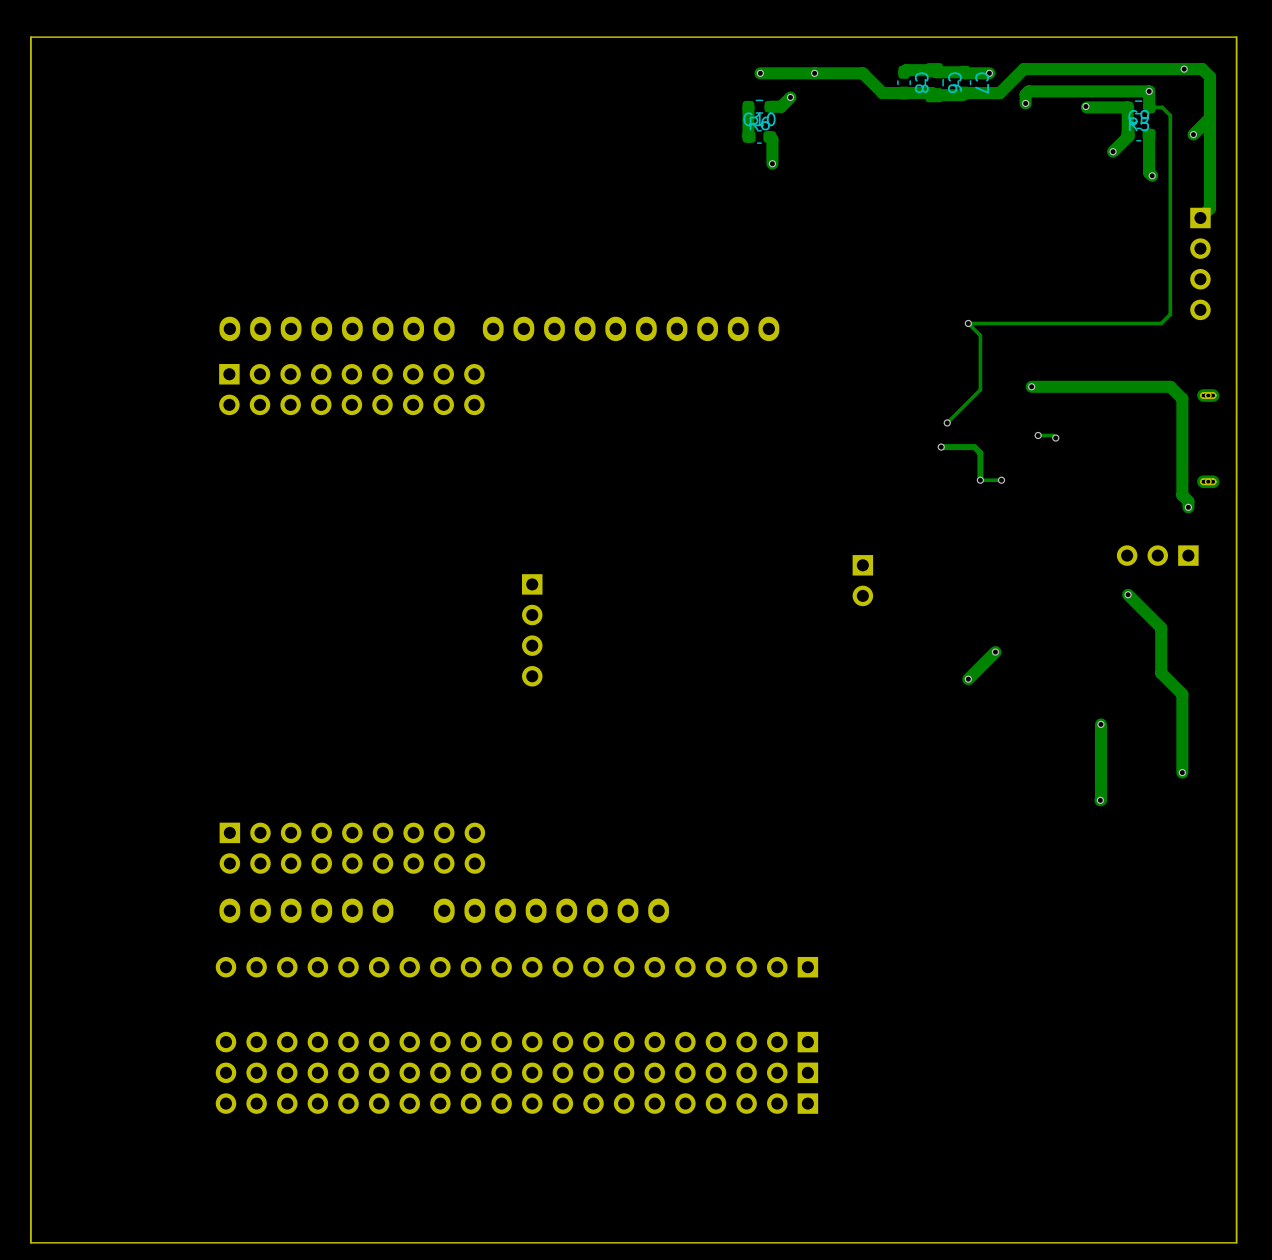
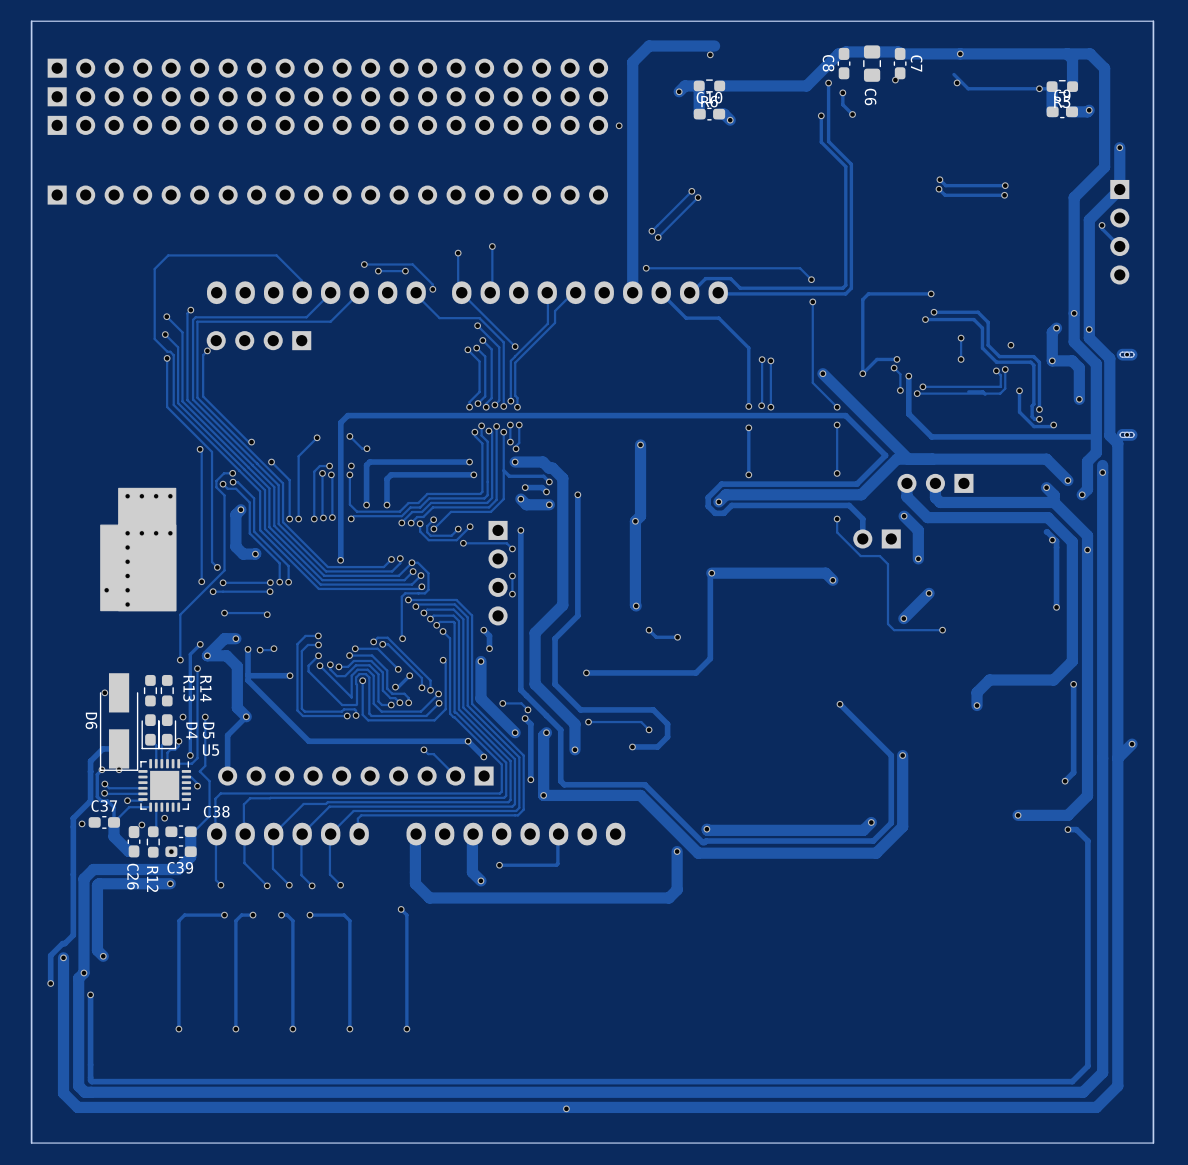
track: none -> (714, 46) (649, 46) (632, 62) (632, 292)
via: (1184, 69) -> none
track: (934, 70) (936, 72) (989, 73) -> (872, 51) (898, 51) (900, 53) (1090, 53) (1104, 68) (1104, 167) (1074, 197) (1074, 341) (1096, 364) (1096, 452) (1087, 461) (1087, 489) (1082, 494)
via: none -> (960, 53)
track: none -> (1067, 53) (1072, 59) (1072, 86)
track: (760, 73) (862, 73) (882, 93) (962, 95) (964, 93) (999, 93) (1023, 69) (1202, 69) (1210, 76) (1210, 208) (1200, 217) -> none
via: (814, 73) -> none
via: (989, 73) -> none
C8 name position: C8 (921, 82) -> C8 (828, 63)
C6 name position: C6 (954, 82) -> C6 (870, 96)
part: none -> (327, 68)
via: (1149, 91) -> none
track: (790, 97) (781, 106) -> (844, 53) (838, 53) (806, 85) (729, 85)
via: (790, 97) -> none
via: none -> (895, 80)
track: none -> (828, 83) (828, 141) (851, 164) (851, 288) (845, 293) (718, 293)
via: none -> (828, 83)
track: (1025, 103) (1025, 94) (1028, 91) (1149, 91) (1149, 106) (1162, 107) (1170, 115) (1170, 314) (1161, 323) (968, 323) (980, 335) (980, 389) (947, 422) -> none
track: none -> (699, 85) (685, 85) (679, 91)
via: (1085, 106) -> none
track: (1127, 107) (1086, 107) -> (1052, 86) (1049, 88) (968, 88) (953, 74)
via: none -> (1039, 88)
via: none -> (679, 91)
track: none -> (842, 92) (842, 104) (852, 114)
via: none -> (842, 92)
part: none -> (327, 96)
track: (1210, 118) (1193, 134) -> none
via: none -> (1089, 110)
track: (1128, 134) (1113, 151) -> none
track: (1149, 134) (1149, 172) (1152, 175) -> (1071, 111) (1089, 110)
via: (1193, 134) -> none
track: (769, 136) (772, 139) (772, 163) -> (719, 114) (724, 114) (730, 120)
via: none -> (852, 114)
track: none -> (821, 115) (821, 142) (845, 166) (845, 285) (842, 288) (740, 288) (730, 278) (705, 278) (690, 293)
via: none -> (821, 115)
part: none -> (327, 125)
via: none -> (619, 125)
via: (1113, 151) -> none
via position: (772, 163) -> (730, 120)
track: none -> (1119, 147) (1119, 189) (1089, 219) (1089, 338) (1109, 358) (1109, 435) (1117, 443) (1117, 1086) (1096, 1107) (77, 1107) (63, 1093) (63, 957)
via: none -> (1119, 147)
via: (1152, 175) -> none
track: none -> (939, 179) (945, 185) (1005, 185)
via: none -> (939, 179)
via: none -> (1005, 185)
track: none -> (939, 189) (945, 195) (1004, 195)
via: none -> (939, 189)
track: none -> (691, 191) (651, 231)
via: none -> (691, 191)
part: none -> (327, 195)
via: none -> (1004, 195)
track: none -> (698, 197) (658, 237)
via: none -> (698, 197)
track: none -> (1102, 225) (1102, 228) (1119, 246)
via: none -> (1102, 225)
via: none -> (651, 231)
via: none -> (658, 237)
track: none -> (492, 246) (490, 293)
via: none -> (492, 246)
track: none -> (458, 253) (458, 289) (515, 346)
via: none -> (458, 253)
track: none -> (364, 264) (412, 264) (432, 284) (432, 289)
via: none -> (364, 264)
track: none -> (646, 268) (800, 268) (811, 279)
via: none -> (646, 268)
via: none -> (378, 271)
track: none -> (405, 271) (378, 271)
via: none -> (405, 271)
via: none -> (811, 279)
via: (968, 323) -> none
via: none -> (432, 289)
track: none -> (301, 293) (301, 280) (276, 255) (168, 255) (154, 268) (154, 339) (173, 355) (173, 404) (239, 470)
track: none -> (329, 293) (306, 317) (195, 317) (193, 319) (193, 399) (257, 463)
track: none -> (358, 293) (330, 321) (197, 321) (197, 397) (283, 483) (283, 522) (327, 567) (383, 567) (391, 559)
track: none -> (415, 293) (439, 318) (479, 318) (503, 342) (503, 406)
track: none -> (547, 293) (547, 323) (514, 356)
track: none -> (576, 293) (572, 293) (555, 311) (555, 322) (515, 362) (515, 395) (517, 397) (517, 407)
track: none -> (661, 293) (686, 318) (718, 318) (748, 348) (748, 406)
track: none -> (931, 293) (868, 293) (862, 299) (862, 373) (877, 359) (896, 359)
via: none -> (931, 293)
track: none -> (812, 301) (812, 382) (837, 407)
via: none -> (812, 301)
track: none -> (190, 310) (187, 313) (187, 400) (252, 465)
via: none -> (190, 310)
track: none -> (934, 312) (978, 312) (988, 322) (988, 345) (999, 356) (1033, 356) (1039, 362) (1039, 409)
via: none -> (934, 312)
via: none -> (1074, 313)
track: none -> (166, 316) (182, 332) (182, 401) (248, 467)
via: none -> (166, 316)
track: none -> (925, 319) (973, 319) (982, 328) (982, 348) (996, 362) (1030, 362) (1033, 365) (1032, 416) (1034, 419) (1039, 419)
via: none -> (925, 319)
track: none -> (477, 325) (499, 347) (499, 400) (494, 404)
via: none -> (477, 325)
track: none -> (1056, 328) (1052, 332) (1052, 360)
via: none -> (1056, 328)
via: none -> (1089, 329)
track: none -> (165, 334) (178, 347) (178, 403) (244, 469)
via: none -> (165, 334)
track: none -> (961, 338) (961, 359)
via: none -> (961, 338)
part: none -> (258, 340)
track: none -> (482, 340) (491, 349) (491, 398) (486, 403) (486, 407)
via: none -> (482, 340)
via: none -> (1010, 345)
via: none -> (515, 346)
track: (1031, 386) (1170, 386) (1182, 398) (1182, 495) (1188, 501) (1188, 507) -> none
via: (1031, 386) -> none
track: none -> (476, 348) (485, 356) (485, 396) (477, 403)
via: none -> (476, 348)
part: (351, 389) -> none
track: none -> (467, 349) (479, 361) (479, 392) (469, 402) (469, 407)
via: none -> (467, 349)
track: none -> (207, 350) (203, 355) (203, 396) (248, 442) (251, 442)
via: none -> (207, 350)
track: none -> (514, 356) (510, 360) (510, 401)
track: none -> (167, 358) (167, 407) (212, 451) (212, 562) (217, 567)
via: none -> (167, 358)
track: none -> (762, 359) (761, 405)
via: none -> (762, 359)
via: none -> (896, 359)
via: none -> (961, 359)
track: none -> (770, 360) (770, 407)
via: none -> (770, 360)
track: none -> (1052, 360) (1072, 360) (1079, 368) (1079, 399)
via: none -> (1052, 360)
track: none -> (894, 368) (900, 374) (900, 390)
via: none -> (894, 368)
track: none -> (1005, 369) (1005, 388) (1000, 393) (917, 393)
via: none -> (1005, 369)
track: none -> (996, 370) (1000, 375) (1000, 386)
via: none -> (996, 370)
track: none -> (822, 373) (908, 459)
via: none -> (822, 373)
via: none -> (862, 373)
track: none -> (908, 376) (908, 414) (931, 436) (1093, 436) (1096, 433)
via: none -> (908, 376)
via: (947, 422) -> none
via: none -> (922, 386)
track: none -> (1000, 386) (922, 386)
via: none -> (900, 390)
track: none -> (1019, 390) (1019, 412) (1034, 426) (1053, 424)
via: none -> (1019, 390)
via: (1038, 435) -> none
via: none -> (917, 393)
via: (1055, 438) -> none
via: none -> (1079, 399)
via: none -> (510, 401)
track: (941, 447) (974, 447) (980, 453) (980, 480) (1001, 480) -> none
via: (941, 447) -> none
via: none -> (477, 403)
via: none -> (494, 404)
via: none -> (761, 405)
via: none -> (469, 407)
via: none -> (486, 407)
via: none -> (503, 406)
via: none -> (517, 407)
via: none -> (748, 406)
via: none -> (770, 407)
via: none -> (837, 407)
via: none -> (1039, 409)
via: none -> (1039, 419)
track: none -> (510, 424) (510, 442)
via: none -> (510, 424)
track: none -> (519, 424) (519, 443) (516, 448)
via: none -> (519, 424)
track: none -> (837, 424) (837, 473)
via: none -> (837, 424)
via: none -> (1053, 424)
track: none -> (481, 425) (481, 435) (487, 441) (487, 495) (484, 498) (429, 498) (420, 507) (410, 507) (401, 516) (353, 516) (351, 518)
via: none -> (481, 425)
track: none -> (496, 426) (496, 499) (489, 507) (432, 507) (423, 517) (417, 517) (411, 523)
via: none -> (496, 426)
track: none -> (748, 427) (748, 474)
via: none -> (748, 427)
track: none -> (488, 431) (492, 432) (492, 497) (487, 502) (431, 502) (422, 512) (412, 512) (401, 522)
via: none -> (488, 431)
track: none -> (474, 432) (474, 435) (482, 443) (482, 491) (480, 493) (427, 493) (418, 503) (408, 503) (399, 511) (357, 511) (349, 504) (349, 474)
via: none -> (474, 432)
track: none -> (503, 432) (503, 499) (490, 511) (451, 511) (433, 528)
via: none -> (503, 432)
via: (980, 480) -> none
via: (1001, 480) -> none
track: none -> (349, 436) (362, 448) (366, 448)
via: none -> (349, 436)
track: none -> (317, 437) (298, 456) (298, 519)
via: none -> (317, 437)
via: none -> (251, 442)
via: none -> (510, 442)
track: none -> (640, 444) (640, 516) (635, 521) (636, 605)
via: none -> (640, 444)
via: none -> (366, 448)
via: none -> (516, 448)
track: none -> (200, 449) (201, 447) (201, 581)
via: none -> (200, 449)
via position: (1188, 507) -> (1102, 472)
track: none -> (271, 462) (289, 480) (289, 519)
via: none -> (271, 462)
track: none -> (469, 462) (369, 462) (366, 465) (366, 505)
via: none -> (469, 462)
track: none -> (515, 462) (542, 462) (562, 478) (562, 605) (535, 633) (535, 684) (574, 724) (574, 749)
via: none -> (515, 462)
track: none -> (257, 463) (278, 485) (278, 524) (326, 571) (392, 571) (400, 563) (400, 558)
track: none -> (252, 465) (274, 487) (274, 525) (324, 575) (398, 575) (411, 562) (417, 562) (428, 573) (428, 589) (425, 593) (418, 593)
track: none -> (1102, 465) (1102, 1072) (1083, 1092) (84, 1092) (78, 1086) (78, 978) (83, 972) (83, 878) (93, 869) (178, 869) (190, 857) (190, 831) (193, 831) (209, 816) (209, 781) (199, 771) (205, 765) (205, 717)
track: none -> (329, 466) (319, 466) (314, 471) (314, 519)
via: none -> (329, 466)
via: none -> (351, 466)
track: none -> (248, 467) (269, 488) (269, 527) (322, 580) (404, 580) (413, 571)
track: none -> (244, 469) (265, 490) (265, 528) (320, 584) (412, 584) (420, 575)
track: none -> (239, 470) (260, 491) (260, 530) (318, 588) (419, 588) (421, 586)
track: none -> (503, 470) (509, 476) (543, 476) (549, 481)
track: none -> (232, 473) (224, 473) (216, 480) (216, 487) (224, 495) (224, 570) (180, 614) (180, 660)
via: none -> (232, 473)
track: none -> (322, 473) (322, 518)
via: none -> (322, 473)
via: none -> (837, 473)
track: none -> (331, 474) (332, 517)
via: none -> (331, 474)
via: none -> (349, 474)
track: none -> (473, 474) (391, 474) (387, 479) (387, 505)
via: none -> (473, 474)
via: none -> (748, 474)
track: none -> (1067, 480) (1046, 459) (896, 459) (861, 494) (726, 494) (718, 501)
via: none -> (1067, 480)
track: none -> (233, 482) (237, 482) (254, 498) (254, 531) (288, 566) (288, 582)
via: none -> (233, 482)
via: none -> (549, 481)
track: none -> (906, 483) (906, 496) (927, 517) (1047, 517) (1072, 542) (1072, 661) (1053, 680) (989, 680) (977, 692) (977, 705)
track: none -> (935, 483) (935, 497) (940, 502) (1054, 502)
track: none -> (223, 484) (227, 488) (236, 488) (249, 502) (249, 533) (279, 563) (279, 582)
via: none -> (223, 484)
track: none -> (525, 487) (542, 487) (546, 491)
via: none -> (525, 487)
track: none -> (1046, 487) (1054, 495) (1054, 502)
via: none -> (1046, 487)
via: none -> (546, 491)
track: none -> (577, 494) (577, 615) (555, 638) (555, 684) (580, 709) (653, 709) (667, 724) (667, 737) (657, 746) (632, 746)
via: none -> (577, 494)
via: none -> (1082, 494)
via: none -> (127, 496)
via: none -> (141, 496)
via: none -> (156, 496)
via: none -> (170, 496)
track: none -> (520, 499) (526, 504) (549, 504)
via: none -> (520, 499)
via: none -> (718, 501)
track: none -> (1054, 502) (1087, 535) (1087, 795) (1067, 815) (1018, 815)
part position: (1157, 555) -> (935, 483)
via: none -> (549, 504)
via: none -> (366, 505)
via: none -> (387, 505)
track: none -> (240, 509) (235, 514) (235, 546) (243, 554) (255, 553)
via: none -> (240, 509)
track: none -> (904, 516) (918, 530) (918, 558)
via: none -> (904, 516)
via: none -> (332, 517)
via: none -> (323, 517)
via: none -> (289, 519)
via: none -> (298, 519)
via: none -> (314, 519)
via: none -> (351, 518)
track: none -> (433, 519) (427, 526) (427, 532) (430, 535) (451, 535) (458, 529)
via: none -> (433, 519)
track: none -> (837, 519) (837, 532) (860, 556) (879, 556) (888, 564) (888, 624) (894, 630) (942, 630)
via: none -> (837, 519)
via: none -> (635, 521)
via: none -> (401, 522)
via: none -> (411, 523)
track: none -> (420, 523) (420, 531) (428, 540) (456, 540) (470, 526)
via: none -> (420, 523)
via: none -> (470, 526)
part rotation: 0° (862, 580) -> 90° clockwise (877, 538)
part position: (862, 580) -> (877, 538)
via: none -> (433, 528)
via: none -> (458, 529)
track: none -> (520, 530) (520, 689) (560, 729) (560, 781) (564, 784) (644, 784) (702, 842) (873, 841) (891, 823) (891, 755) (839, 704)
via: none -> (520, 530)
track: none -> (1046, 531) (1056, 541) (1056, 607)
via: none -> (127, 533)
via: none -> (141, 533)
via: none -> (156, 533)
via: none -> (170, 533)
track: none -> (862, 538) (862, 519) (849, 505) (731, 505) (723, 513) (715, 513) (708, 506) (708, 497) (721, 484) (856, 484) (885, 455) (845, 415) (347, 415) (340, 422) (340, 560)
track: (1128, 594) (1161, 627) (1161, 673) (1182, 694) (1182, 772) -> none
track: none -> (463, 543) (506, 543) (512, 548)
via: none -> (463, 543)
via: none -> (127, 547)
part: none -> (138, 549)
via: none -> (512, 548)
via: none -> (1087, 549)
via: none -> (255, 554)
via: none -> (400, 558)
via: none -> (391, 559)
via: none -> (918, 558)
via: none -> (340, 560)
via: none -> (127, 561)
via: none -> (411, 562)
via: none -> (217, 567)
via: none -> (413, 571)
via: none -> (711, 573)
via: none -> (420, 575)
via: none -> (127, 576)
track: none -> (512, 576) (512, 594)
via: none -> (512, 576)
track: none -> (832, 580) (825, 573) (711, 573) (710, 658) (696, 672) (586, 672)
via: none -> (832, 580)
via: none -> (201, 581)
via: none -> (279, 582)
via: none -> (223, 582)
track: none -> (270, 582) (223, 582)
via: none -> (270, 582)
via: none -> (288, 582)
via: none -> (421, 586)
via: none -> (106, 590)
via: none -> (127, 590)
via: none -> (213, 591)
track: none -> (270, 591) (213, 591)
via: none -> (270, 591)
track: none -> (418, 593) (405, 593) (401, 596) (402, 638)
via: none -> (512, 594)
track: none -> (408, 599) (456, 599) (472, 615) (472, 703) (523, 755) (523, 809) (518, 815) (361, 815) (357, 818) (357, 835)
via: none -> (408, 599)
via: none -> (127, 604)
via: none -> (636, 605)
track: none -> (415, 606) (417, 604) (454, 604) (467, 617) (467, 705) (519, 757) (519, 807) (516, 810) (353, 810) (329, 835)
via: none -> (415, 606)
via: none -> (1056, 607)
track: none -> (224, 613) (265, 613) (267, 614)
via: none -> (224, 613)
track: none -> (423, 613) (427, 609) (453, 609) (463, 619) (463, 707) (514, 759) (514, 804) (512, 806) (329, 806) (300, 835)
via: none -> (423, 613)
via: none -> (267, 614)
track: none -> (430, 619) (433, 615) (453, 615) (458, 621)
via: none -> (430, 619)
track: none -> (458, 621) (458, 709) (510, 760) (510, 799) (508, 802) (327, 802) (326, 803) (303, 803) (272, 835)
track: none -> (436, 625) (440, 621) (454, 622) (454, 712) (506, 762) (506, 795) (504, 797) (250, 798) (243, 804) (243, 835)
via: none -> (436, 625)
track: none -> (483, 630) (489, 635) (489, 648)
via: none -> (483, 630)
track: none -> (649, 630) (656, 637) (677, 637)
via: none -> (649, 630)
via: none -> (942, 630)
track: none -> (443, 631) (450, 638) (450, 713) (501, 764) (501, 791) (499, 793) (220, 793) (215, 798) (215, 835)
via: none -> (443, 631)
track: none -> (318, 635) (305, 635) (297, 644) (297, 710) (302, 716) (347, 716)
via: none -> (318, 635)
via: none -> (677, 637)
track: none -> (235, 638) (224, 638) (207, 655) (226, 655) (237, 666) (237, 707) (246, 716) (227, 735) (227, 776)
via: none -> (235, 638)
via: none -> (402, 638)
track: none -> (373, 641) (377, 637) (387, 637) (430, 680) (430, 690)
via: none -> (373, 641)
track: none -> (200, 644) (190, 654) (190, 755)
via: none -> (200, 644)
track: none -> (382, 644) (388, 644) (421, 678) (421, 687)
via: none -> (382, 644)
track: none -> (318, 644) (307, 644) (301, 651) (301, 708) (304, 711) (341, 711) (344, 709) (354, 709) (356, 715)
via: none -> (318, 644)
track: none -> (273, 648) (260, 650)
via: none -> (273, 648)
track: none -> (355, 648) (377, 648) (398, 669)
via: none -> (355, 648)
via: none -> (489, 648)
track: none -> (248, 649) (248, 680) (308, 741) (468, 741) (483, 756)
via: none -> (248, 649)
via: none -> (260, 650)
track: none -> (349, 655) (372, 655) (387, 670) (387, 688) (392, 693) (404, 693) (408, 698) (408, 702)
via: none -> (349, 655)
via: none -> (207, 655)
track: none -> (318, 655) (308, 665) (308, 671) (342, 705) (357, 704) (356, 677) (359, 674) (365, 674) (369, 677) (369, 713) (371, 715) (426, 715) (439, 703)
via: none -> (318, 655)
via: none -> (180, 660)
track: none -> (443, 660) (445, 662) (445, 709) (434, 720) (368, 720) (362, 714) (362, 680)
via: none -> (443, 660)
track: (1100, 724) (1100, 800) -> none
via: (1100, 724) -> none
track: none -> (480, 661) (480, 698) (515, 732)
via: none -> (480, 661)
track: none -> (330, 664) (330, 669) (336, 676) (345, 676) (355, 665) (369, 665) (378, 674) (378, 701) (381, 704) (391, 704)
via: none -> (330, 664)
track: none -> (319, 665) (351, 697) (351, 675) (357, 669) (367, 669) (373, 675) (373, 703) (381, 711) (420, 711) (438, 693)
via: none -> (319, 665)
track: none -> (338, 666) (348, 666) (353, 660) (371, 660) (382, 672) (382, 690) (390, 698) (395, 698) (399, 702)
via: none -> (338, 666)
track: none -> (197, 668) (197, 758) (191, 763) (178, 763)
via: none -> (197, 668)
via: none -> (398, 669)
via: none -> (586, 672)
track: none -> (248, 675) (290, 675)
via: none -> (290, 675)
track: none -> (409, 675) (398, 687) (395, 687)
via: none -> (409, 675)
via: none -> (362, 680)
track: none -> (1073, 684) (1073, 772) (1065, 781)
via: none -> (1073, 684)
via: none -> (395, 687)
via: none -> (421, 687)
R13: none -> (150, 690)
R14: none -> (167, 690)
via: none -> (430, 690)
via: none -> (104, 692)
via: none -> (438, 693)
via: none -> (399, 702)
via: none -> (408, 702)
via: none -> (439, 703)
track: none -> (502, 703) (521, 703) (527, 709)
via: none -> (502, 703)
via: none -> (839, 704)
via: none -> (391, 704)
via: none -> (977, 705)
via: (1182, 772) -> none
via: none -> (527, 709)
via: none -> (347, 716)
via: none -> (356, 715)
via: none -> (183, 717)
via: none -> (205, 717)
via: none -> (246, 716)
track: none -> (525, 718) (530, 724) (530, 779)
via: none -> (525, 718)
D6: none -> (119, 722)
track: none -> (588, 722) (641, 722) (649, 729)
via: none -> (588, 722)
via: none -> (649, 729)
D4: none -> (150, 731)
D5: none -> (167, 731)
via: (1100, 800) -> none
via: none -> (515, 732)
track: none -> (546, 732) (543, 735) (543, 795) (640, 795) (698, 853) (876, 853) (902, 826) (902, 755)
via: none -> (546, 732)
track: none -> (150, 739) (156, 745) (156, 763)
track: none -> (167, 739) (161, 745) (161, 763)
track: none -> (178, 741) (178, 746) (175, 749) (170, 749) (167, 752) (167, 763)
via: none -> (178, 741)
via: none -> (468, 741)
track: none -> (1132, 744) (1117, 758)
via: none -> (1132, 744)
via: none -> (632, 746)
track: none -> (423, 749) (428, 754) (433, 754) (455, 776)
via: none -> (423, 749)
via: none -> (574, 749)
via: none -> (190, 755)
via: none -> (902, 755)
via: none -> (483, 756)
track: none -> (101, 769) (97, 774) (97, 796) (101, 801) (107, 801) (114, 807) (114, 822)
via: none -> (101, 769)
track: none -> (119, 769) (119, 748) (102, 748) (90, 761) (90, 801) (73, 818) (73, 935) (50, 955) (50, 983)
via: none -> (119, 769)
part: (352, 848) -> none
part: none -> (355, 776)
track: none -> (186, 777) (191, 777) (197, 783) (197, 786)
via: none -> (530, 779)
via: none -> (1065, 781)
track: none -> (104, 784) (109, 788) (142, 788)
via: none -> (104, 784)
U5: none -> (164, 785)
via: none -> (197, 786)
track: none -> (104, 793) (142, 793)
via: none -> (104, 793)
via: none -> (543, 795)
track: none -> (142, 799) (127, 800)
via: none -> (127, 800)
track: none -> (150, 807) (129, 807) (114, 822)
track: none -> (156, 807) (156, 828) (153, 831)
via: none -> (1018, 815)
via: none -> (164, 818)
C37: none -> (104, 822)
track: none -> (114, 822) (114, 836) (128, 851) (134, 851)
track: none -> (871, 822) (863, 830) (706, 829)
via: none -> (871, 822)
via: none -> (82, 823)
via: none -> (141, 824)
via: none -> (706, 829)
track: none -> (1067, 829) (1076, 829) (1087, 841) (1087, 1066) (1072, 1081) (91, 1081) (90, 994)
via: none -> (1067, 829)
C38: none -> (181, 831)
track: none -> (215, 835) (215, 880) (220, 885)
track: none -> (244, 835) (244, 863) (267, 885)
track: none -> (272, 835) (272, 868) (289, 885)
track: none -> (301, 835) (301, 875) (312, 885)
track: none -> (329, 835) (329, 874) (340, 885)
track: none -> (415, 835) (415, 883) (429, 898) (669, 898) (677, 889) (677, 851)
track: none -> (472, 835) (472, 872) (480, 880)
track: none -> (557, 835) (556, 865) (499, 865)
C26: none -> (134, 841)
R12: none -> (153, 841)
via: none -> (171, 851)
C39: none -> (181, 851)
via: none -> (677, 851)
via: none -> (499, 865)
via: none -> (480, 880)
track: none -> (170, 883) (99, 883) (97, 885) (97, 950) (103, 956)
via: none -> (170, 883)
via: none -> (220, 885)
via: none -> (289, 885)
via: none -> (340, 885)
via: none -> (267, 885)
via: none -> (312, 885)
part: (516, 967) -> none
track: none -> (401, 909) (406, 915) (406, 1029)
via: none -> (401, 909)
track: none -> (224, 915) (184, 915) (178, 920) (178, 1029)
via: none -> (224, 915)
track: none -> (253, 915) (241, 915) (235, 920) (235, 1029)
via: none -> (253, 915)
track: none -> (281, 915) (287, 915) (292, 920) (292, 1029)
via: none -> (281, 915)
track: none -> (309, 915) (344, 915) (349, 920) (349, 1029)
via: none -> (309, 915)
via: none -> (103, 956)
part: (516, 1042) -> none
via: none -> (63, 957)
via: none -> (83, 972)
via: none -> (50, 983)
part: (516, 1072) -> none
via: none -> (90, 994)
part: (516, 1103) -> none
via: none -> (178, 1029)
via: none -> (235, 1029)
via: none -> (292, 1029)
via: none -> (349, 1029)
via: none -> (406, 1029)
via: none -> (566, 1108)

